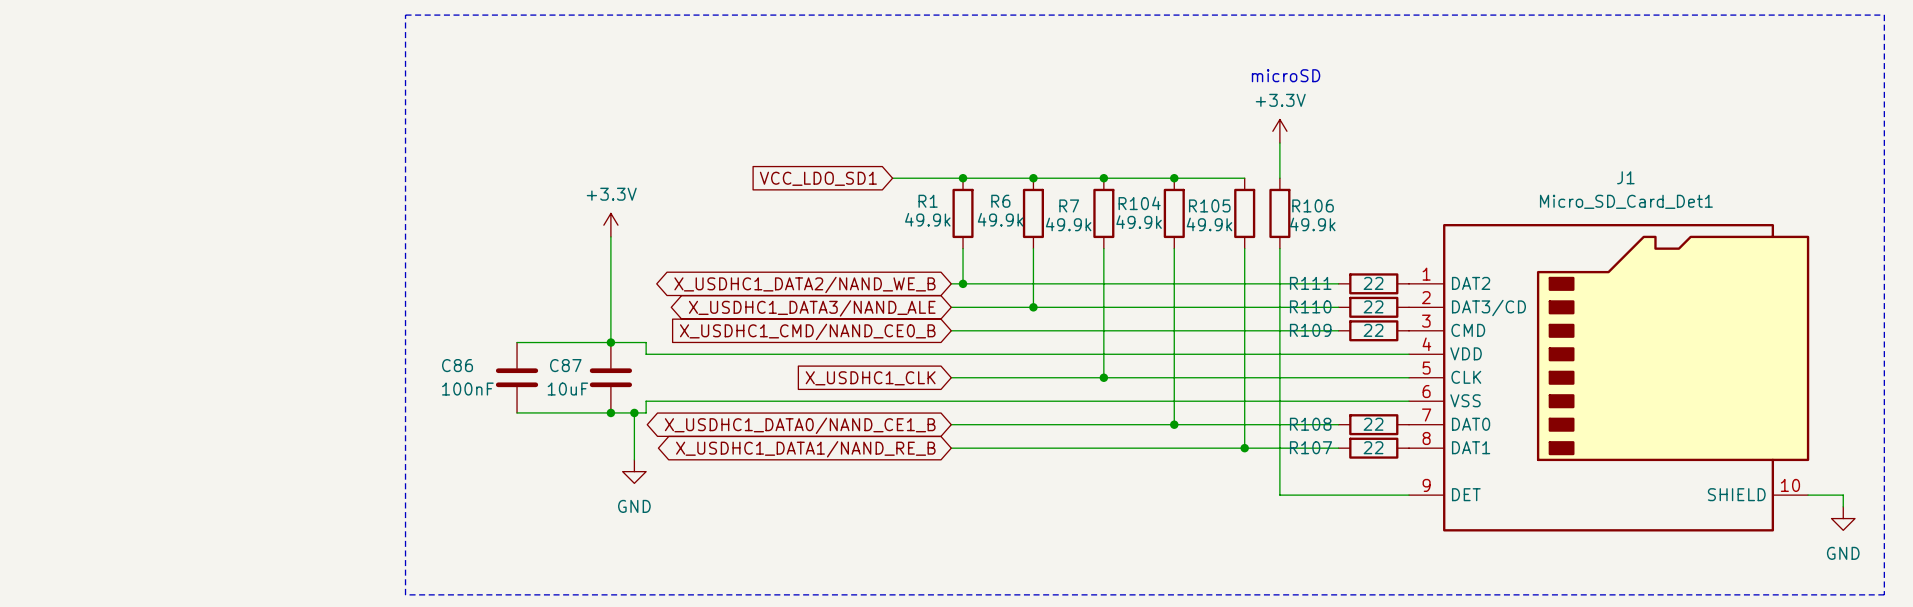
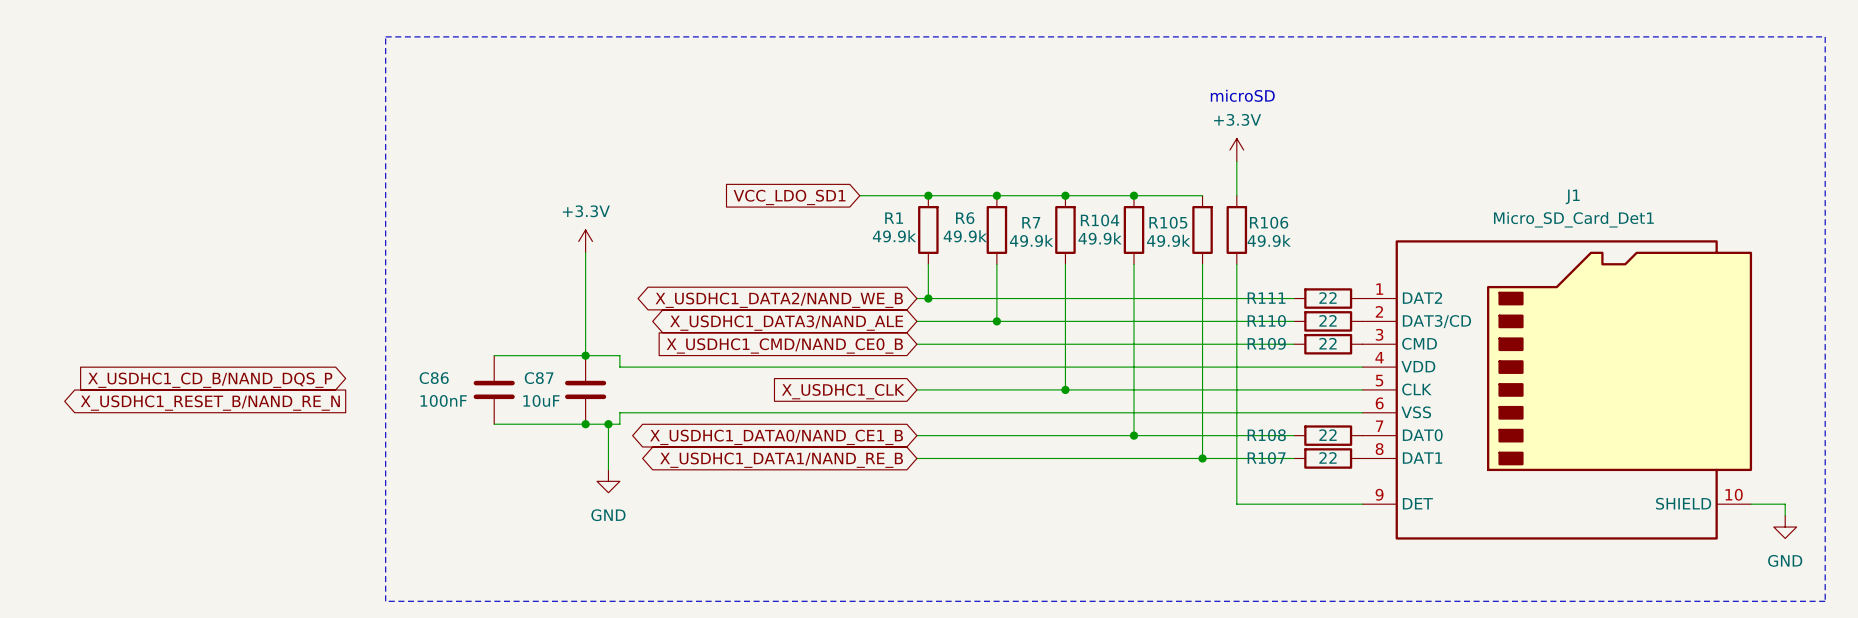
global label: none -> X_USDHC1_CD_B/NAND_DQS_P (210, 380)
global label: none -> X_USDHC1_RESET_B/NAND_RE_N (210, 403)

